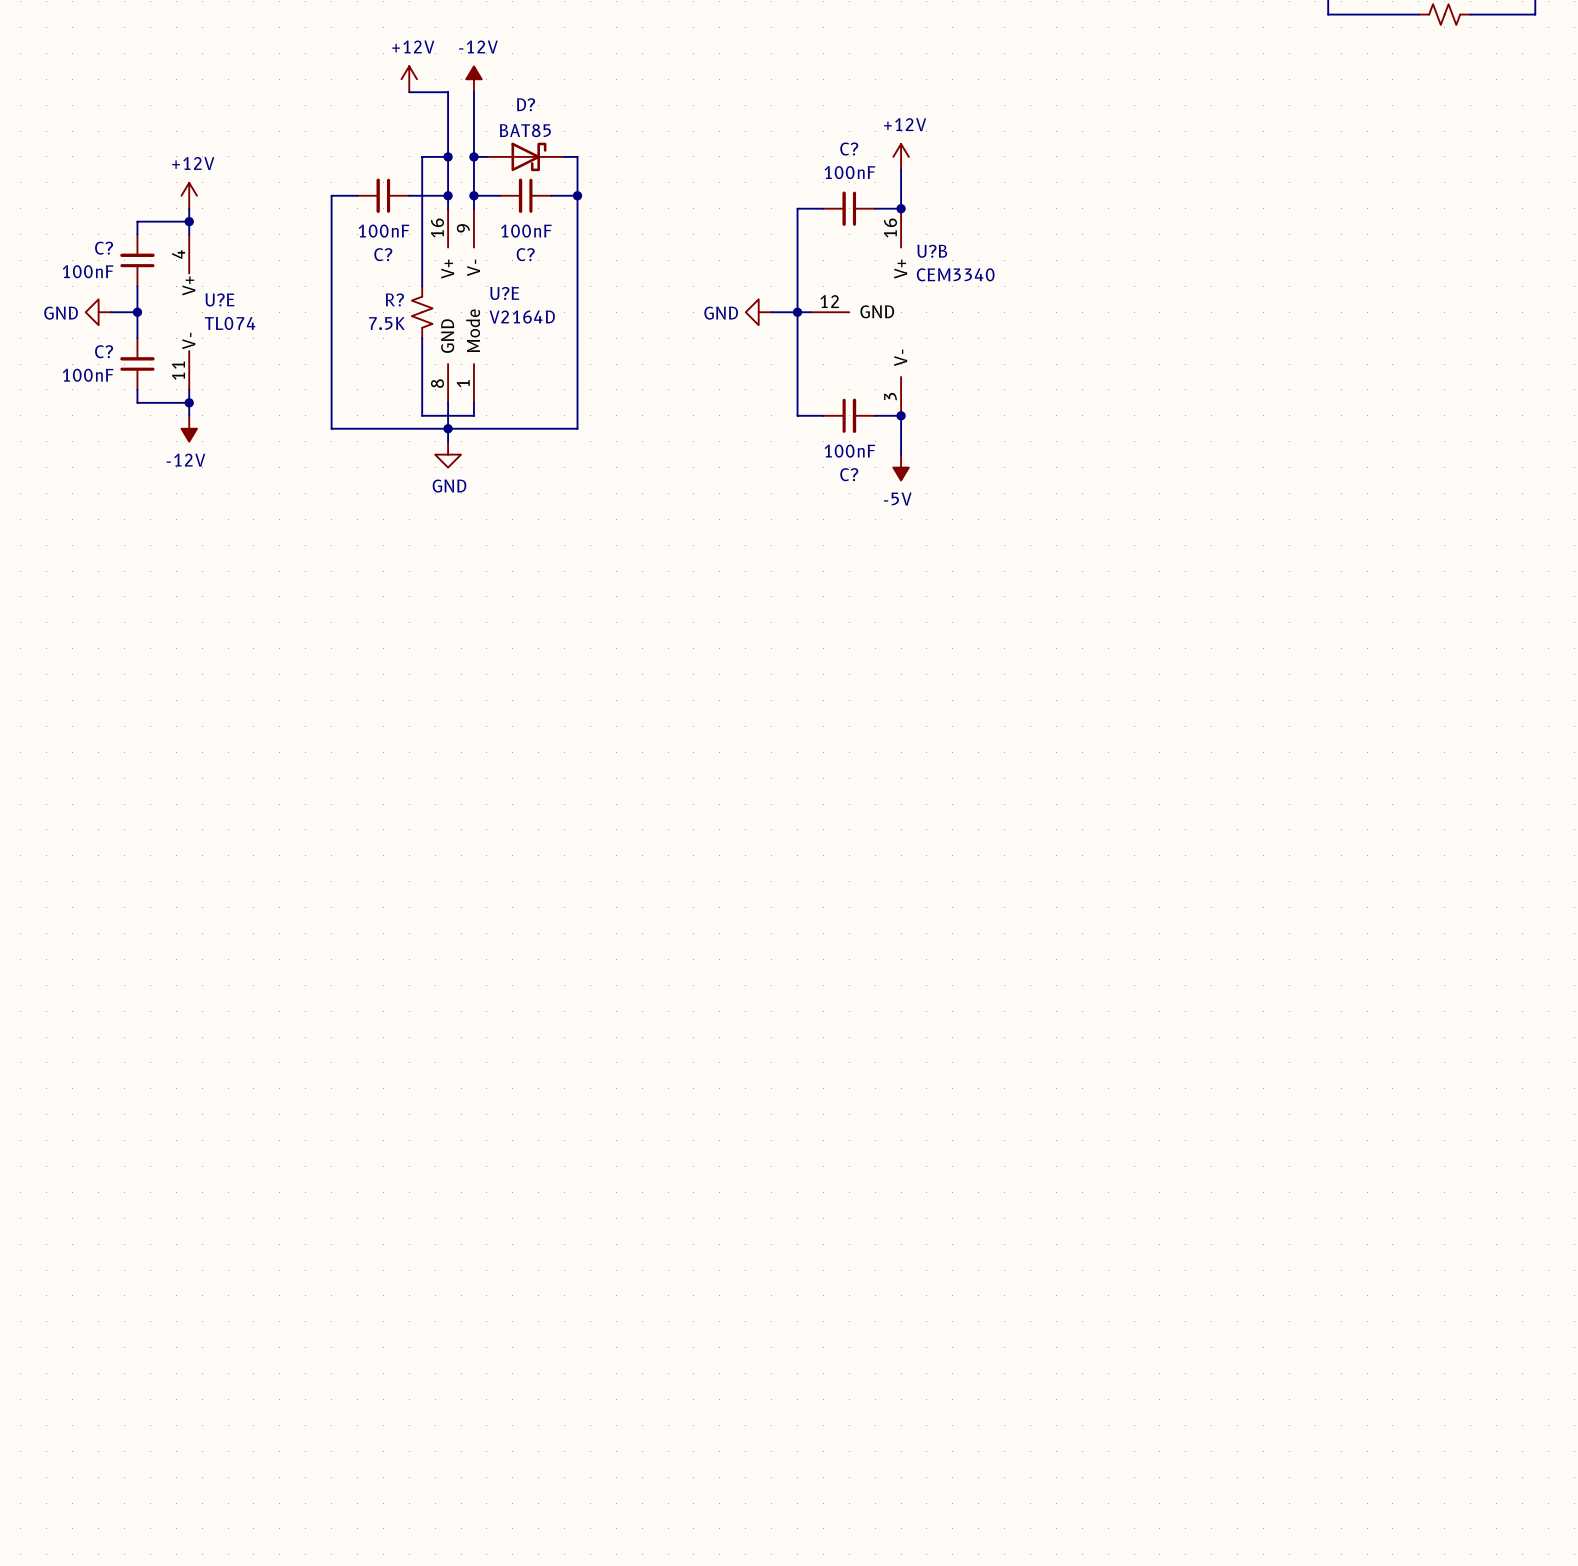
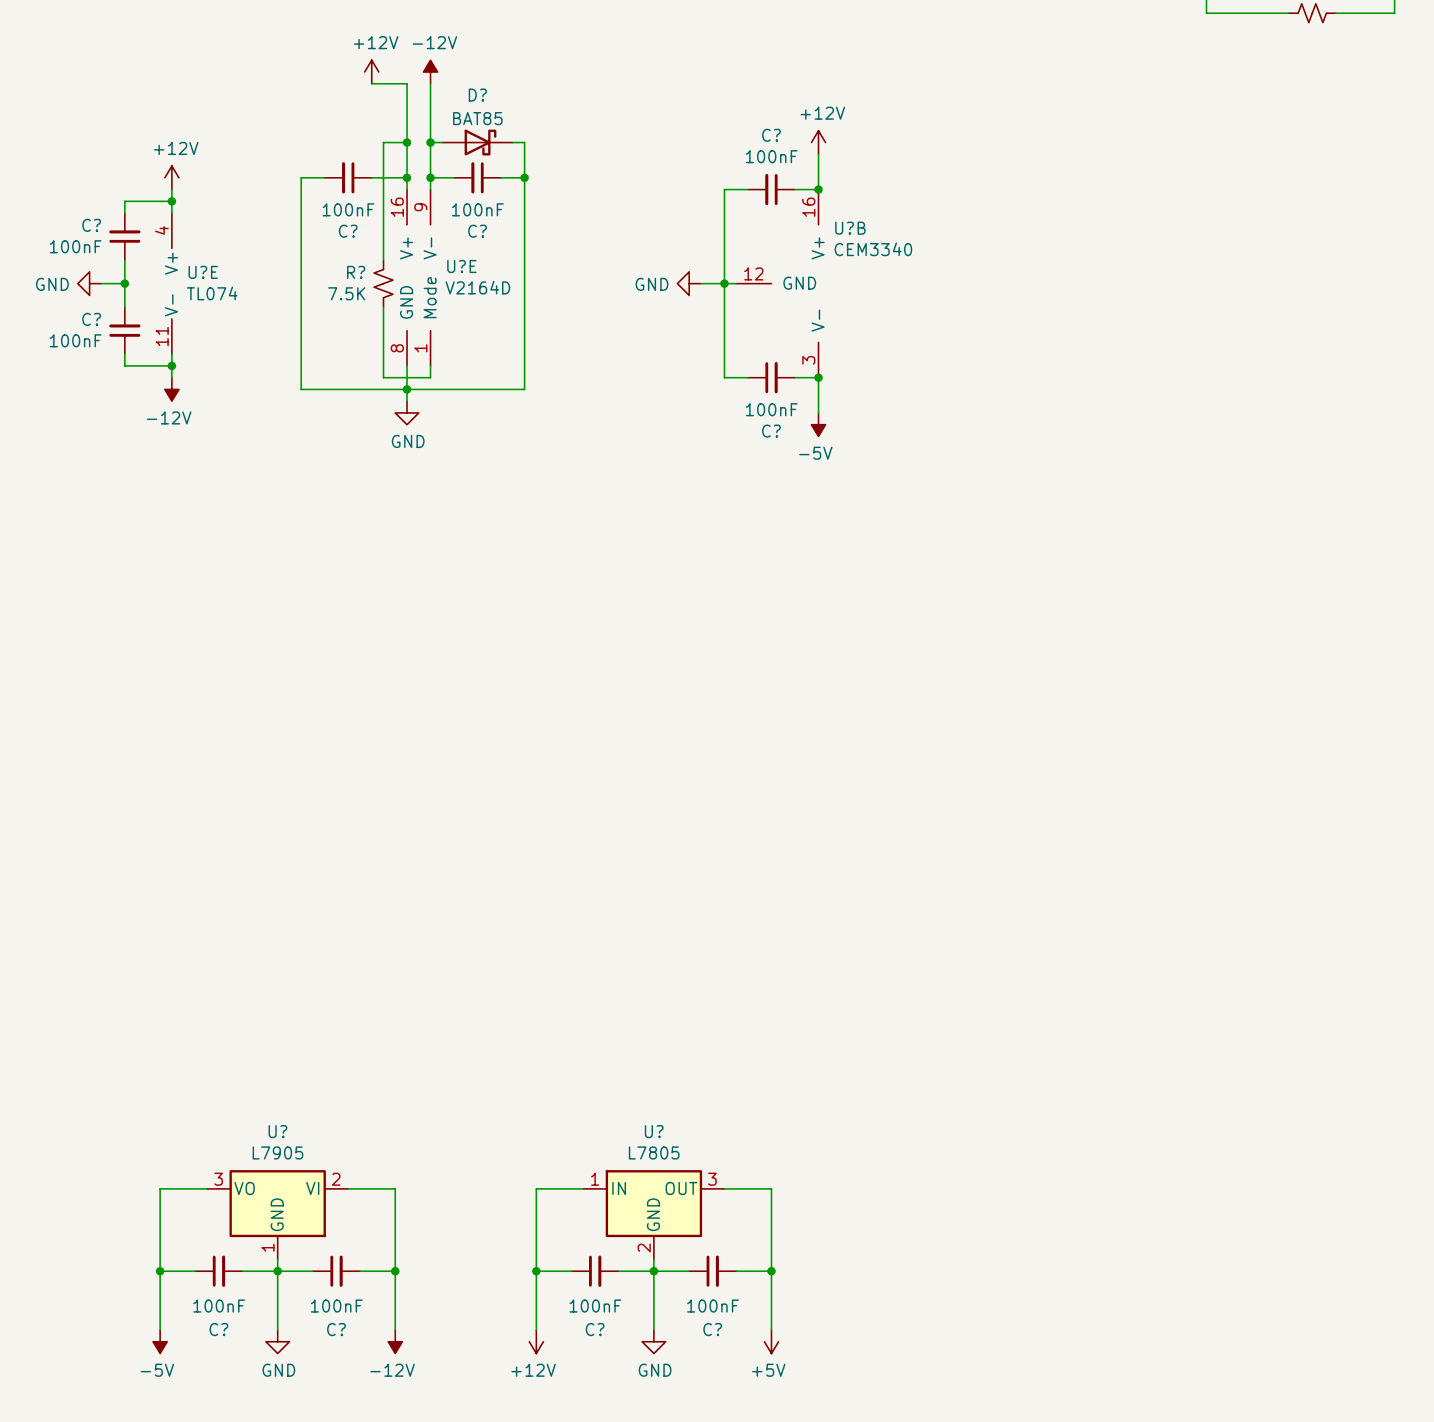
wire: none -> (207, 1188) (160, 1188) (160, 1330)
wire: none -> (348, 1188) (395, 1188) (395, 1330)
wire: none -> (583, 1188) (536, 1188) (536, 1330)
wire: none -> (724, 1188) (771, 1188) (771, 1330)
U?: none -> L7905 (277, 1214)
U?: none -> L7805 (653, 1214)
wire: none -> (277, 1259) (277, 1330)
wire: none -> (653, 1259) (653, 1330)
wire: none -> (160, 1271) (195, 1271)
junction: none -> (160, 1271)
C?: none -> 100nF (218, 1271)
wire: none -> (242, 1271) (312, 1271)
junction: none -> (277, 1271)
C?: none -> 100nF (336, 1271)
wire: none -> (359, 1271) (395, 1271)
junction: none -> (395, 1271)
wire: none -> (536, 1271) (571, 1271)
junction: none -> (536, 1271)
C?: none -> 100nF (595, 1271)
wire: none -> (618, 1271) (689, 1271)
junction: none -> (653, 1271)
C?: none -> 100nF (712, 1271)
wire: none -> (736, 1271) (771, 1271)
junction: none -> (771, 1271)
power symbol: none -> -5V (160, 1341)
power symbol: none -> GND (277, 1341)
power symbol: none -> -12V (395, 1341)
power symbol: none -> +12V (536, 1341)
power symbol: none -> GND (653, 1341)
power symbol: none -> +5V (771, 1341)

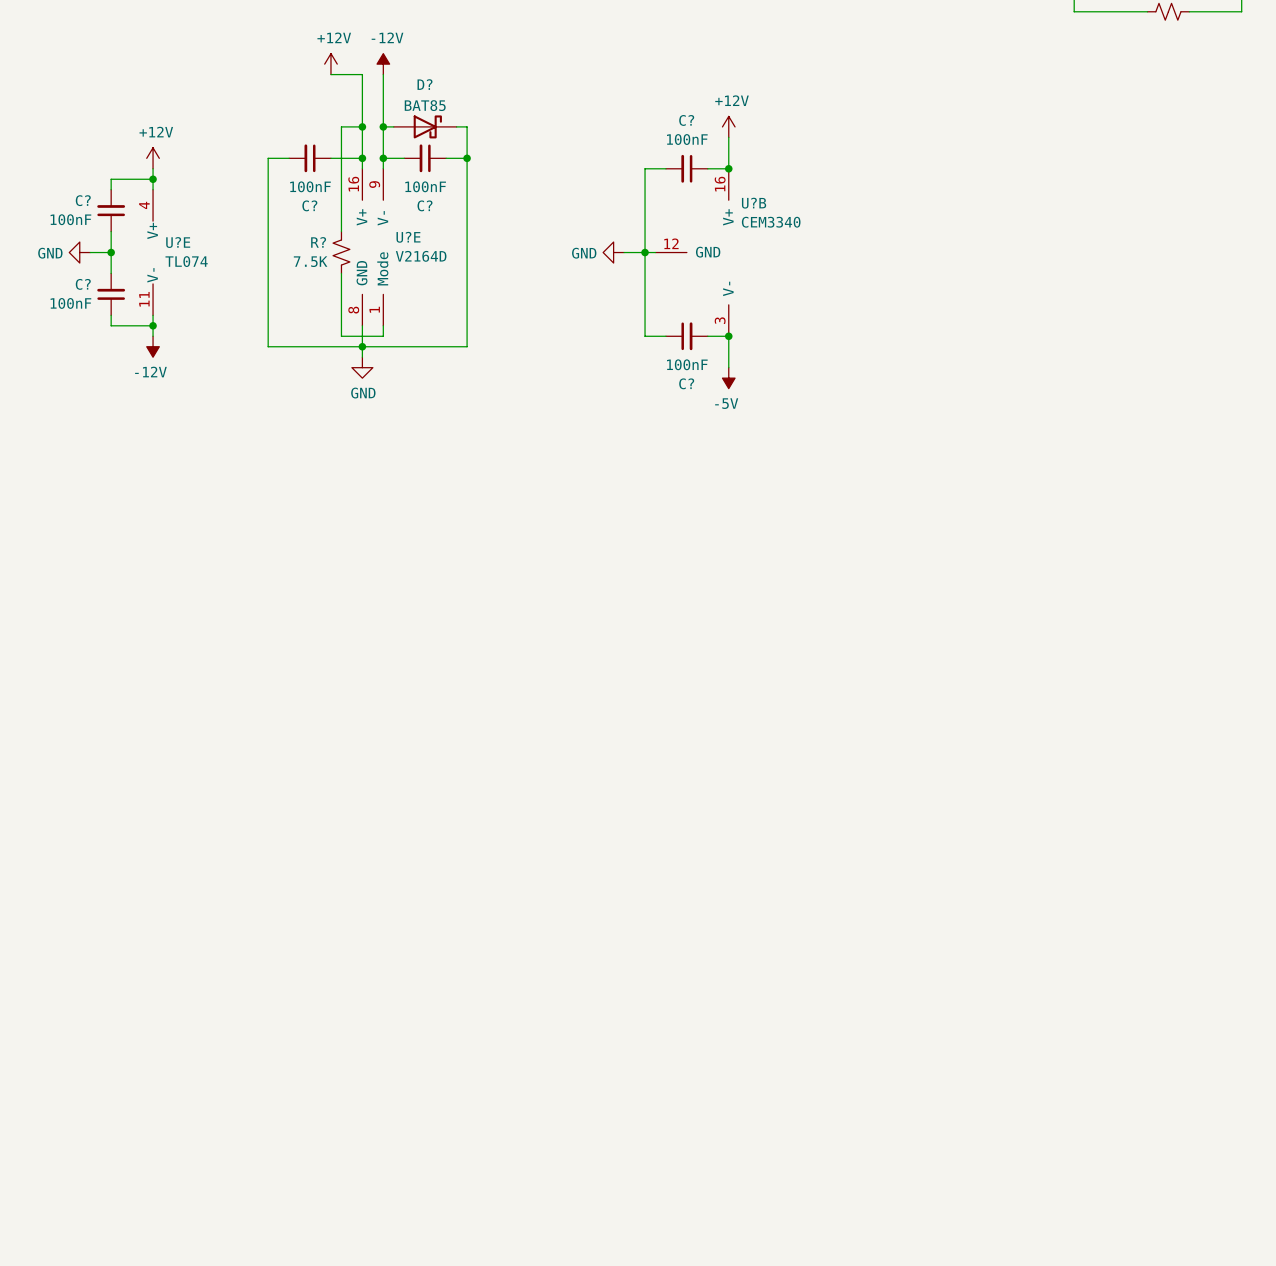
wire: (207, 1188) (160, 1188) (160, 1330) -> none
wire: (348, 1188) (395, 1188) (395, 1330) -> none
wire: (583, 1188) (536, 1188) (536, 1330) -> none
wire: (724, 1188) (771, 1188) (771, 1330) -> none
U?: L7905 (277, 1214) -> none
U?: L7805 (653, 1214) -> none
wire: (277, 1259) (277, 1330) -> none
wire: (653, 1259) (653, 1330) -> none
wire: (160, 1271) (195, 1271) -> none
junction: (160, 1271) -> none
C?: 100nF (218, 1271) -> none
wire: (242, 1271) (312, 1271) -> none
junction: (277, 1271) -> none
C?: 100nF (336, 1271) -> none
wire: (359, 1271) (395, 1271) -> none
junction: (395, 1271) -> none
wire: (536, 1271) (571, 1271) -> none
junction: (536, 1271) -> none
C?: 100nF (595, 1271) -> none
wire: (618, 1271) (689, 1271) -> none
junction: (653, 1271) -> none
C?: 100nF (712, 1271) -> none
wire: (736, 1271) (771, 1271) -> none
junction: (771, 1271) -> none
power symbol: -5V (160, 1341) -> none
power symbol: GND (277, 1341) -> none
power symbol: -12V (395, 1341) -> none
power symbol: +12V (536, 1341) -> none
power symbol: GND (653, 1341) -> none
power symbol: +5V (771, 1341) -> none

